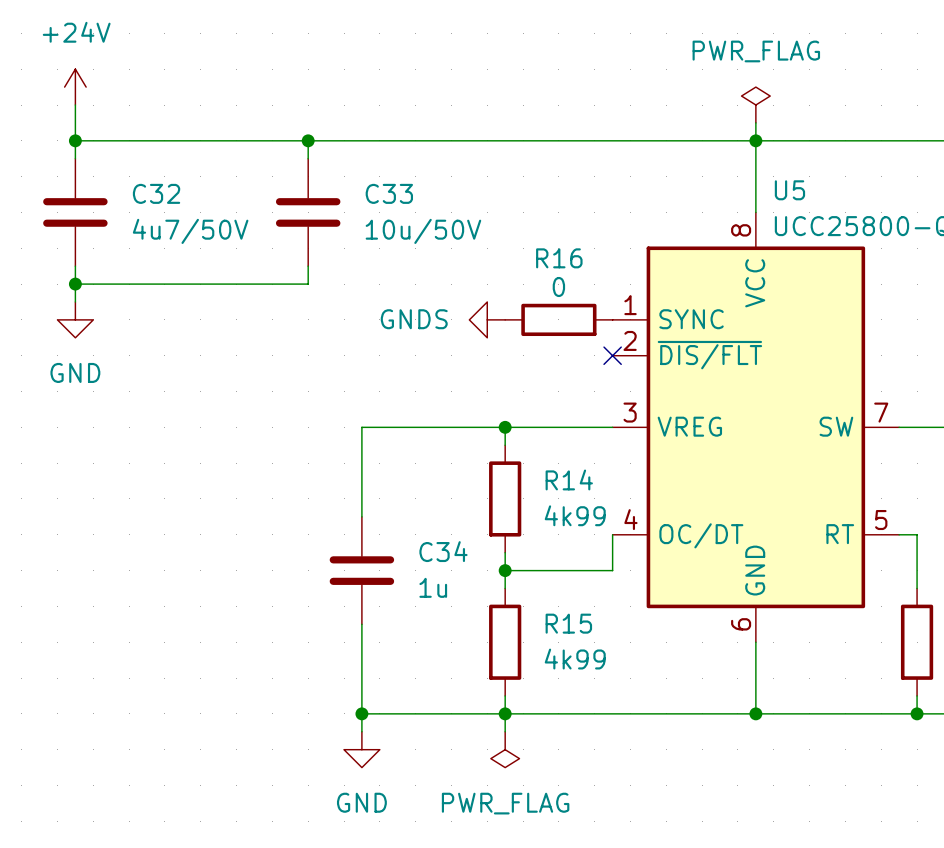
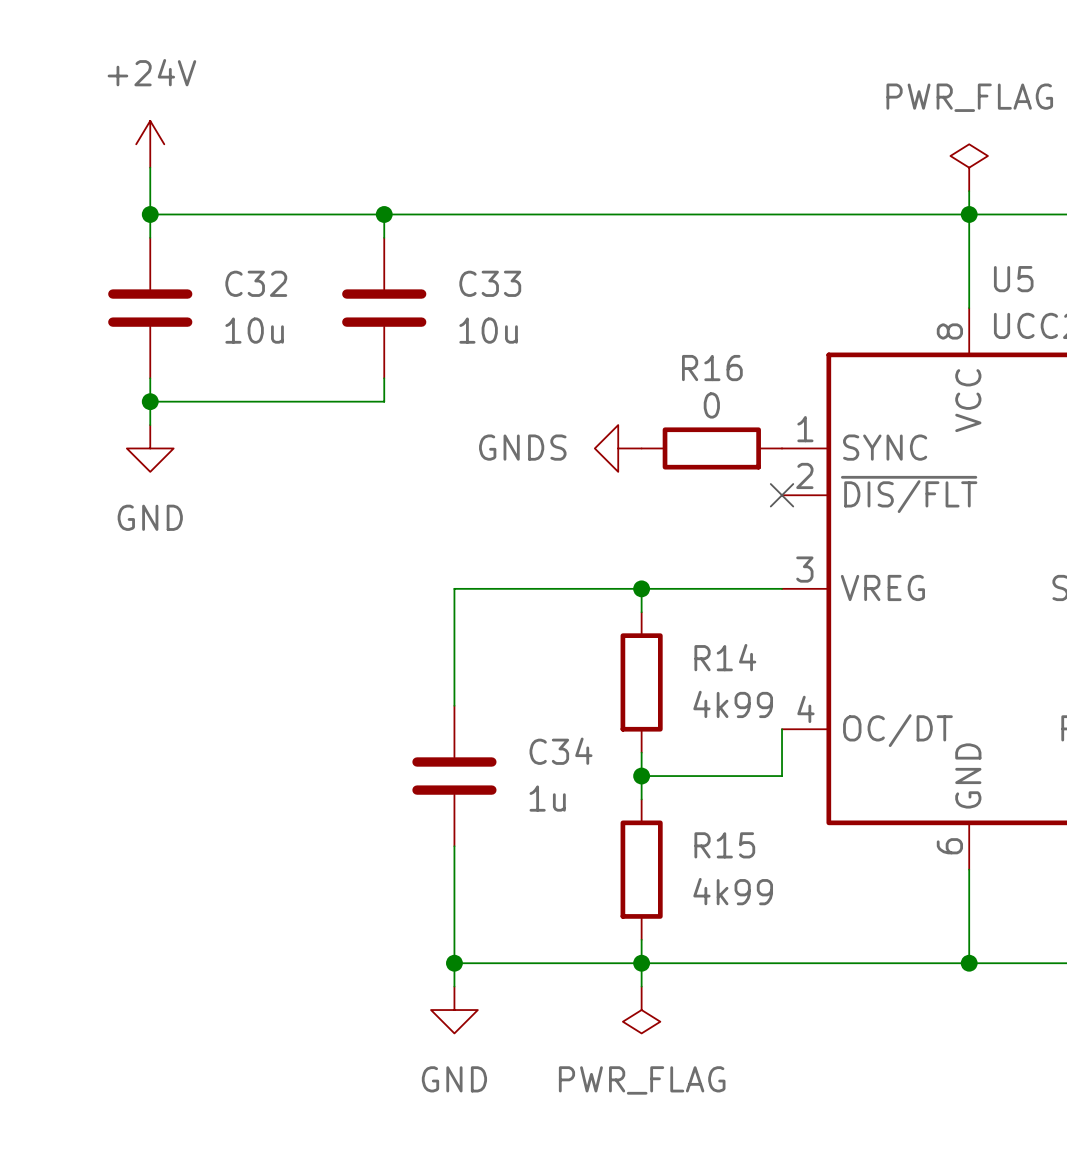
power symbol position: +24V (75, 87) -> +24V (150, 144)
wire: (75, 105) (75, 158) -> (150, 167) (150, 237)
wire: (75, 140) (129, 140) -> none
junction position: (75, 140) -> (150, 214)
C32 position: (75, 212) -> (150, 308)
C32 value: 4u7/50V (190, 231) -> 10u (254, 330)
C33 value: 10u/50V (423, 231) -> 10u (488, 330)
wire: (75, 266) (75, 301) -> (150, 378) (150, 425)
wire: (75, 284) (129, 284) -> none
junction position: (75, 284) -> (150, 401)
power symbol position: GND (75, 319) -> GND (150, 448)

